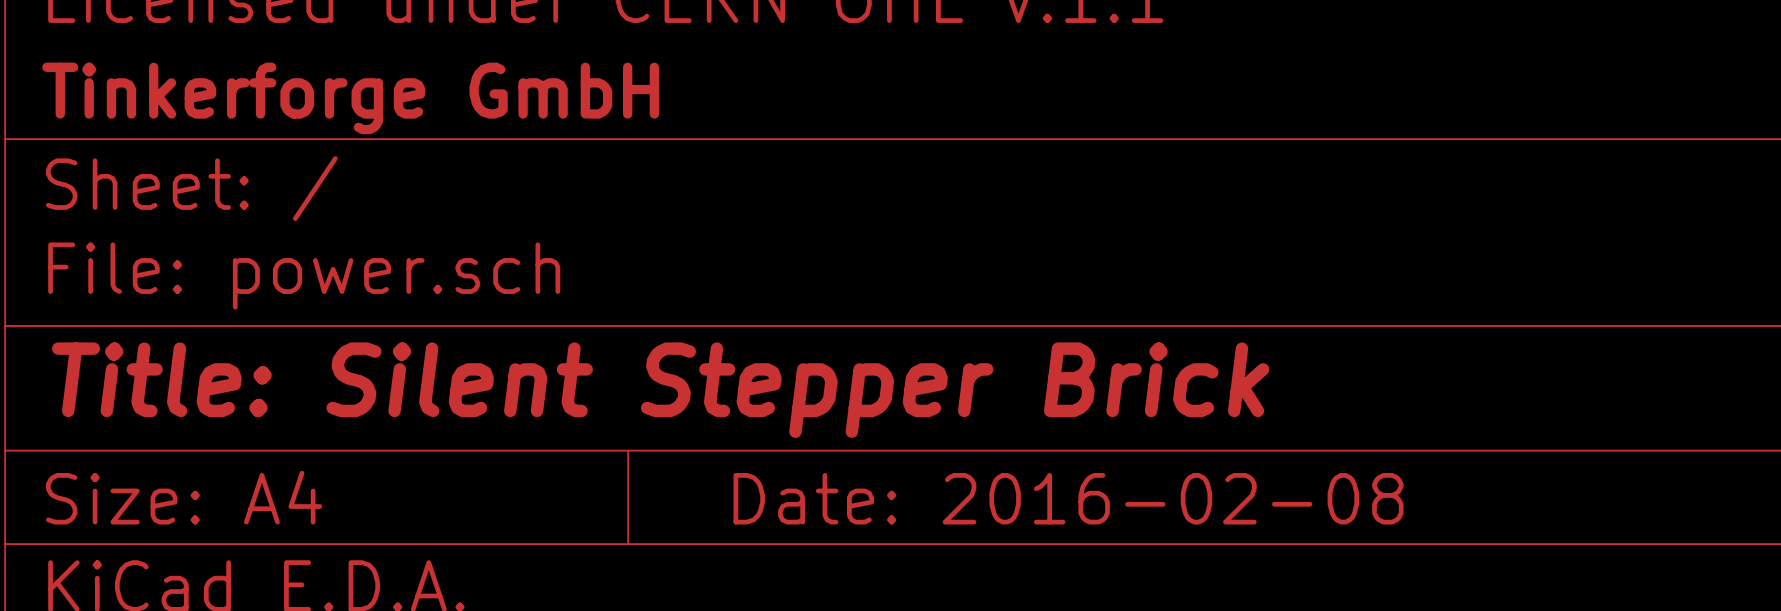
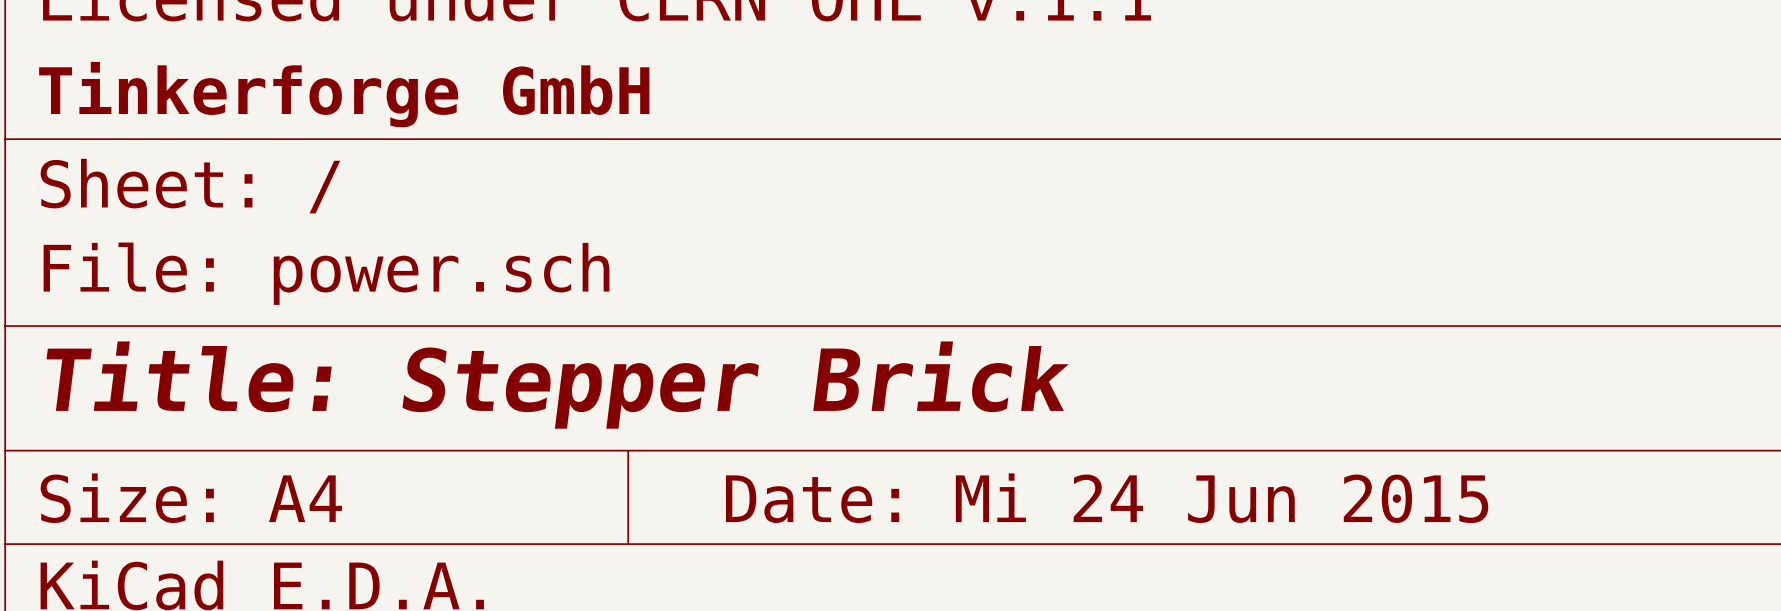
title block: Title: Silent Stepper Brick (660, 390) -> Title: Stepper Brick (557, 385)
title block: Date: 2016-02-08 (1068, 498) -> Date: Mi 24 Jun 2015 (1107, 498)

